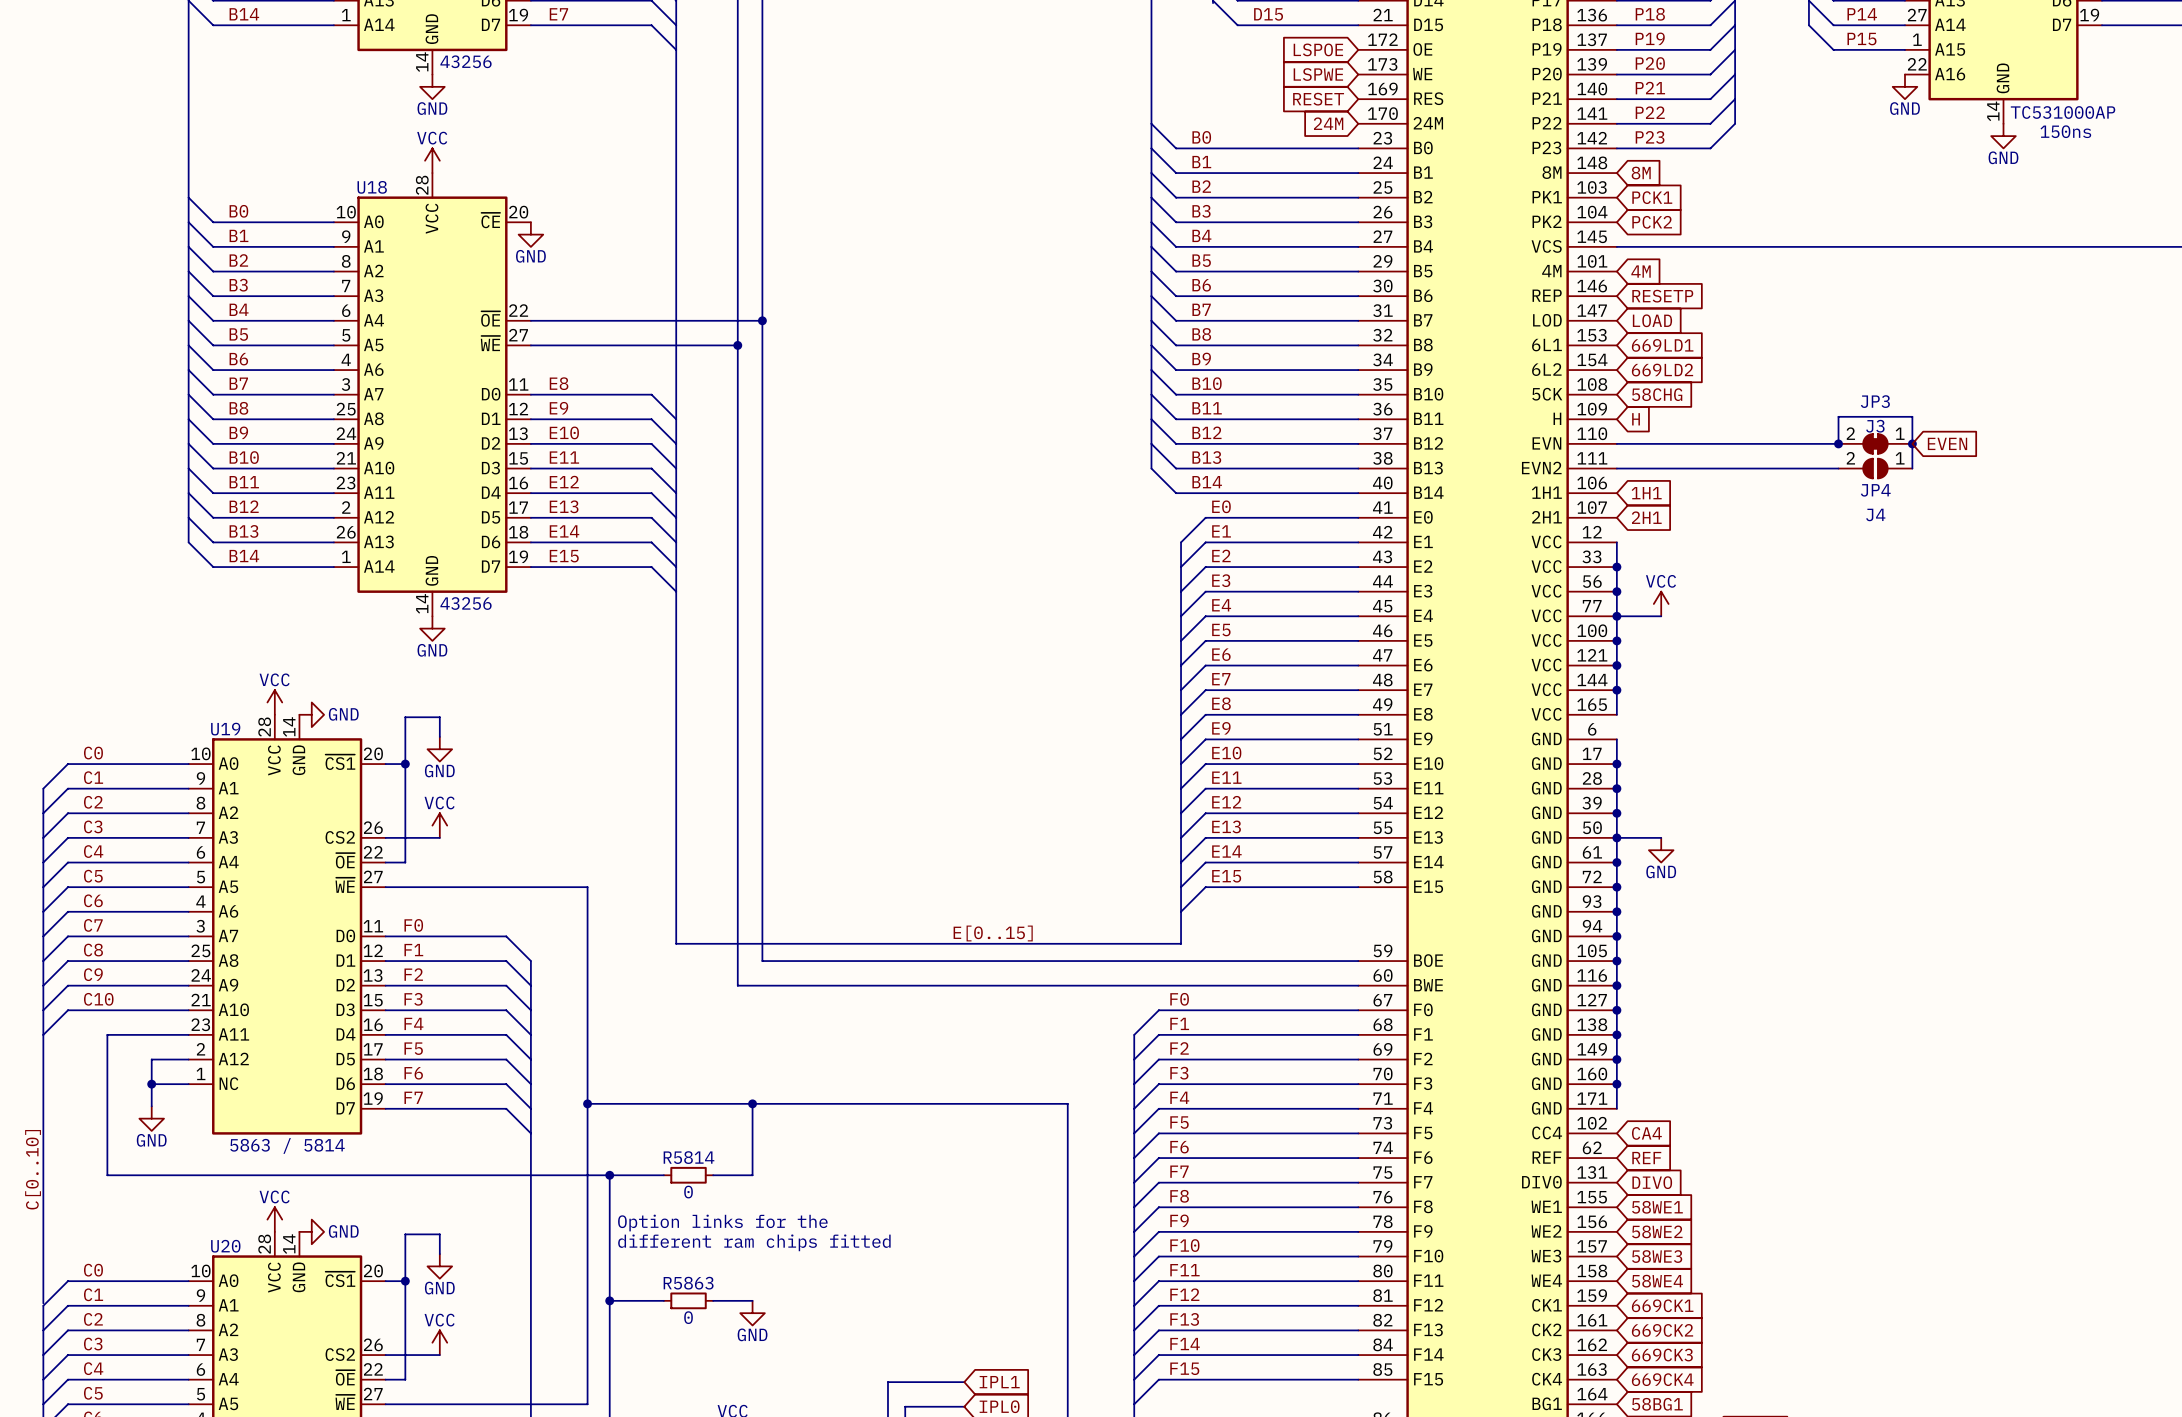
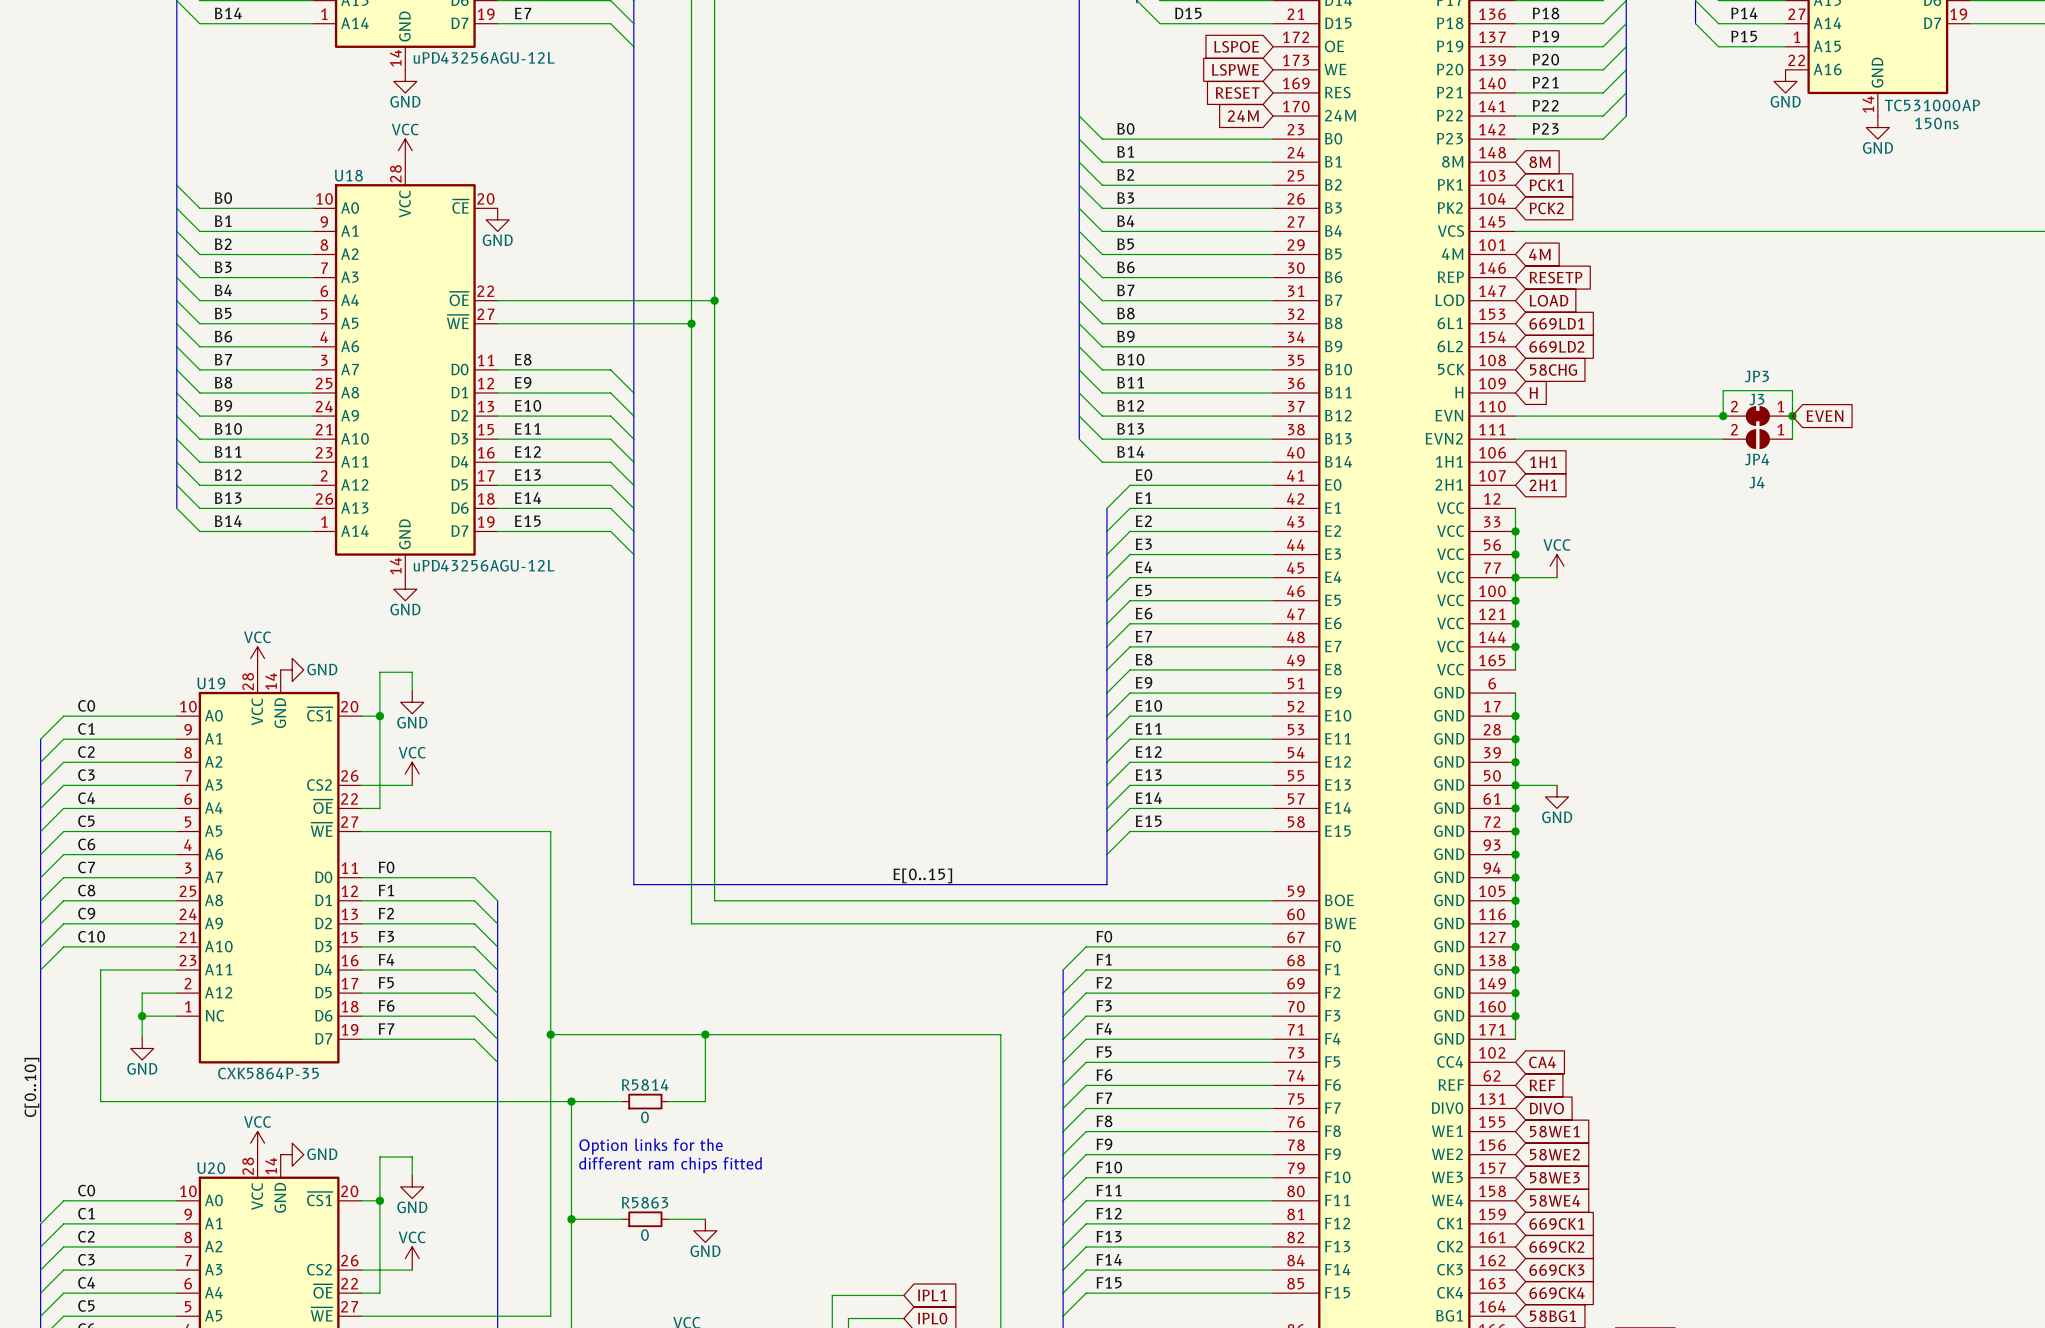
part value: 43256 (466, 61) -> uPD43256AGU-12L (484, 57)
U18 value: 43256 (466, 603) -> uPD43256AGU-12L (484, 565)
U19 value: 5863 / 5814 (287, 1145) -> CXK5864P-35 (268, 1073)

